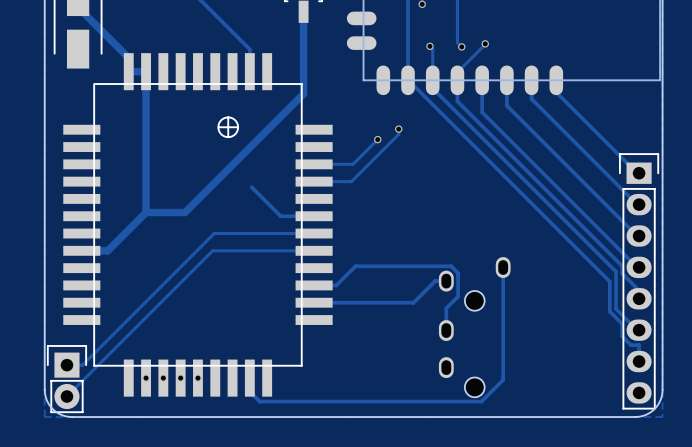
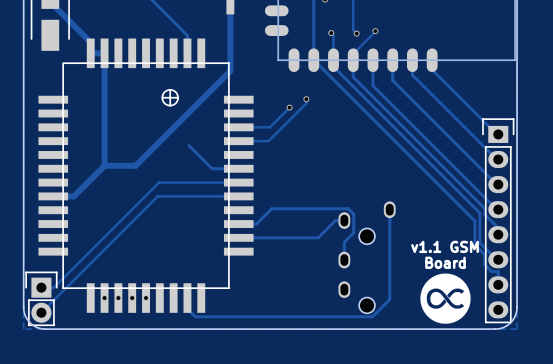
text: none -> v1.1 GSM (445, 246)
text: none -> Board (445, 262)
drawing: none -> [420, 273, 471, 324]

